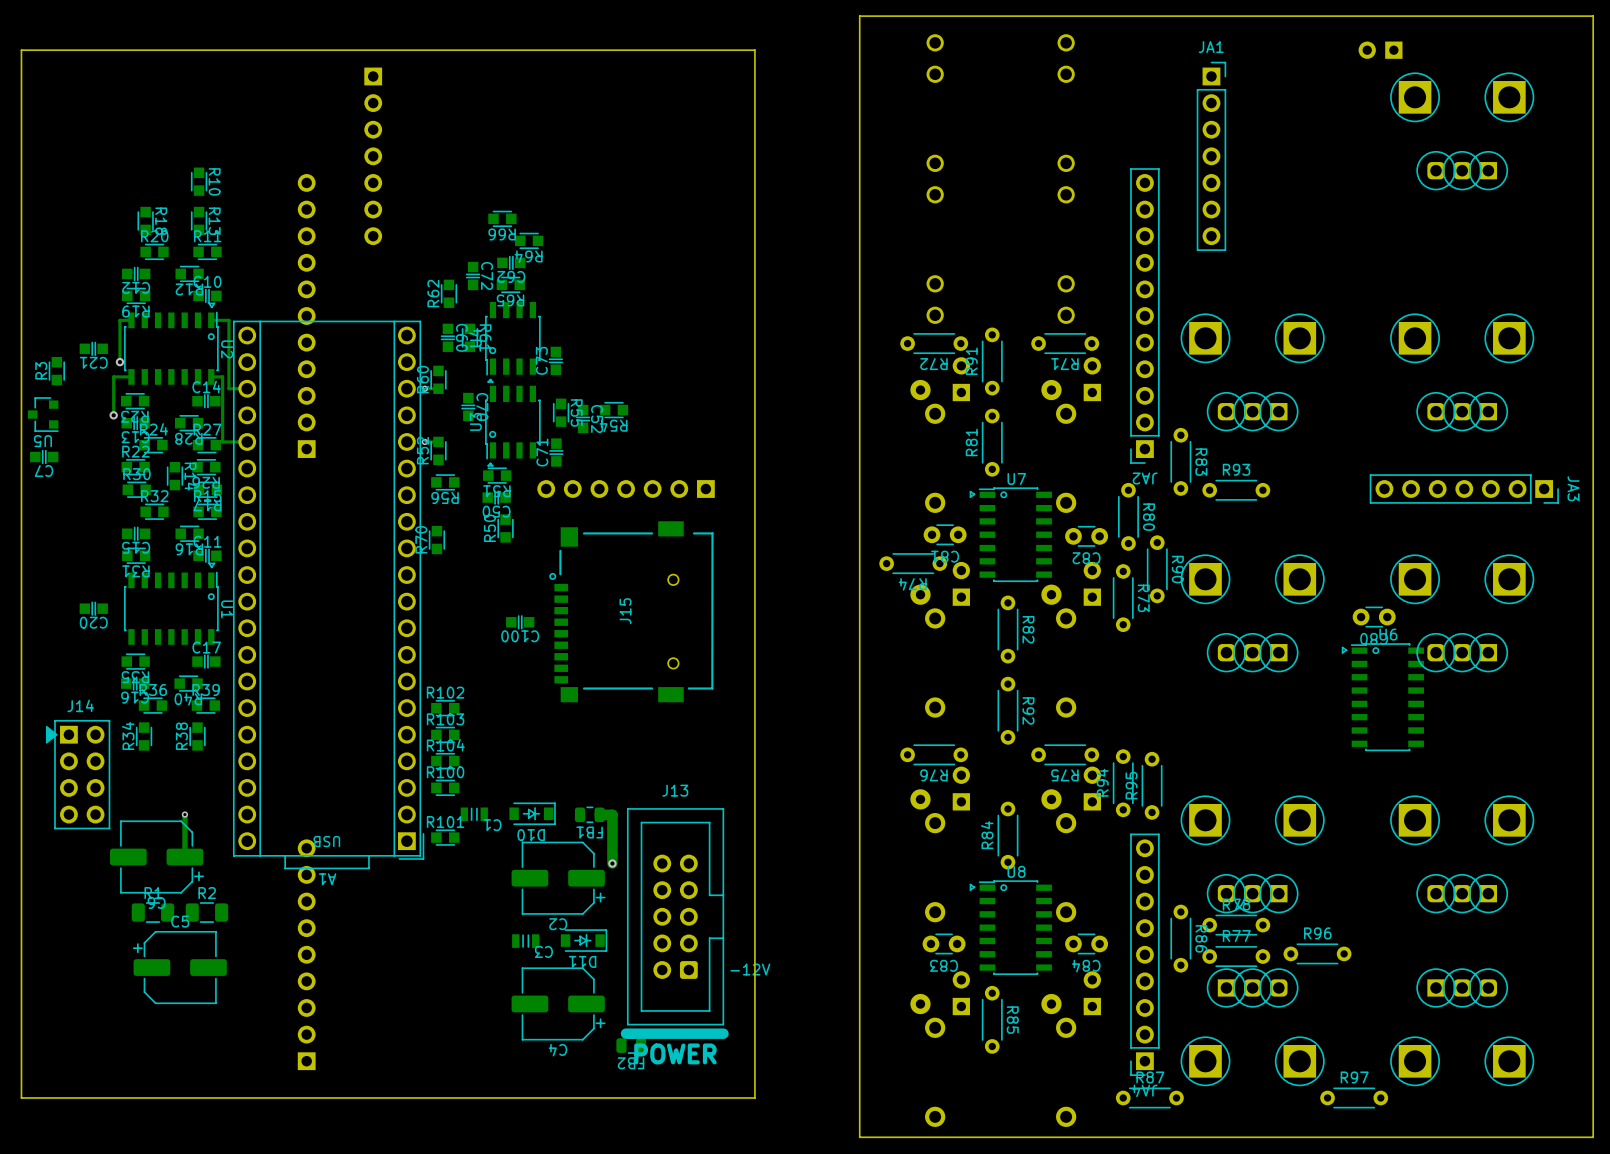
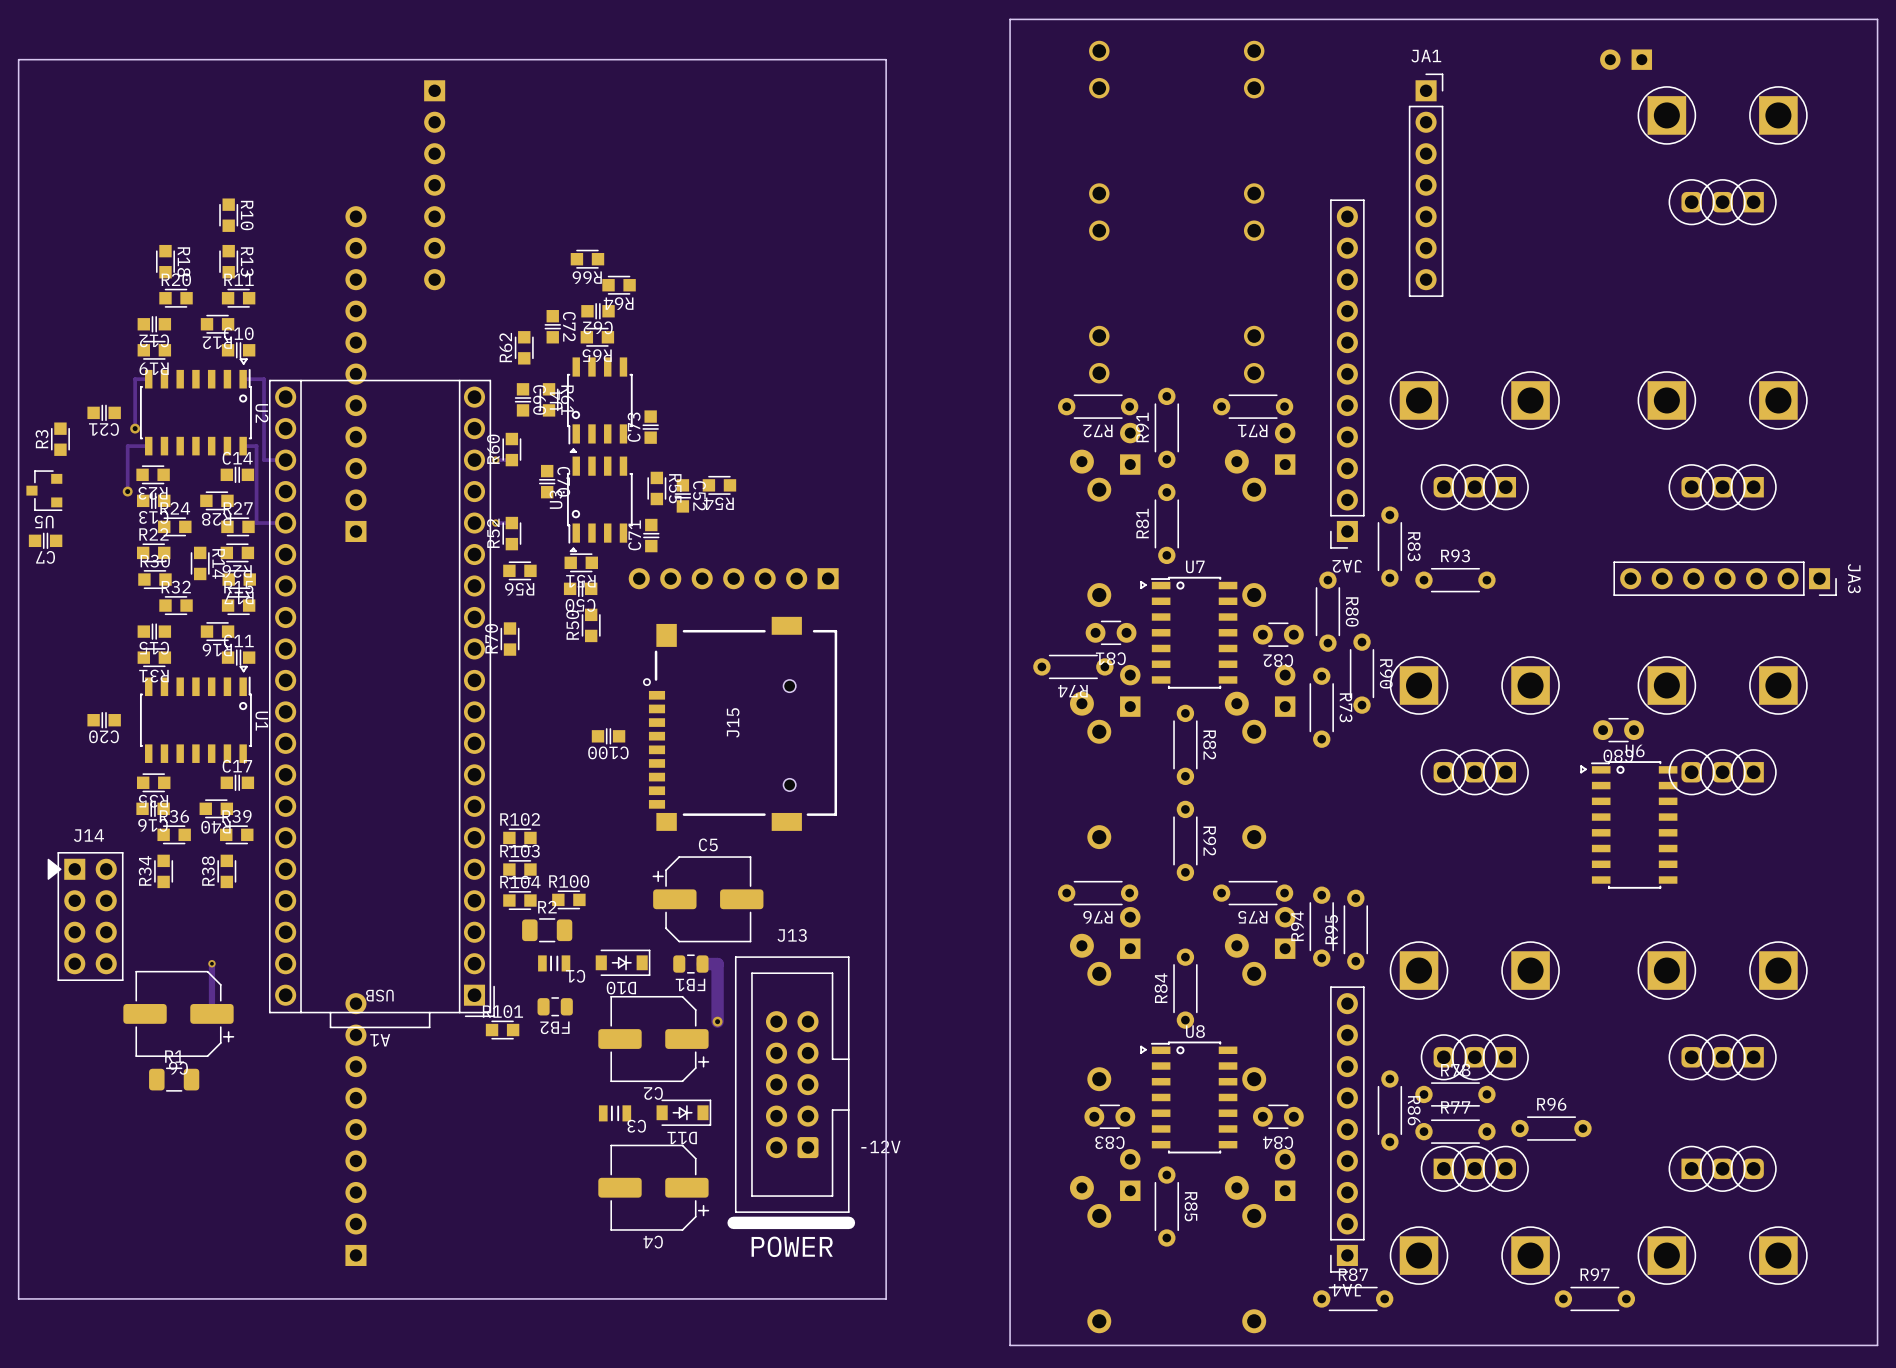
R100 position: (445, 787) -> (568, 899)
R101 position: (445, 837) -> (502, 1030)
R2 position: (206, 912) -> (547, 930)
C5 position: (179, 967) -> (708, 899)
FB2 position: (631, 1045) -> (555, 1006)

